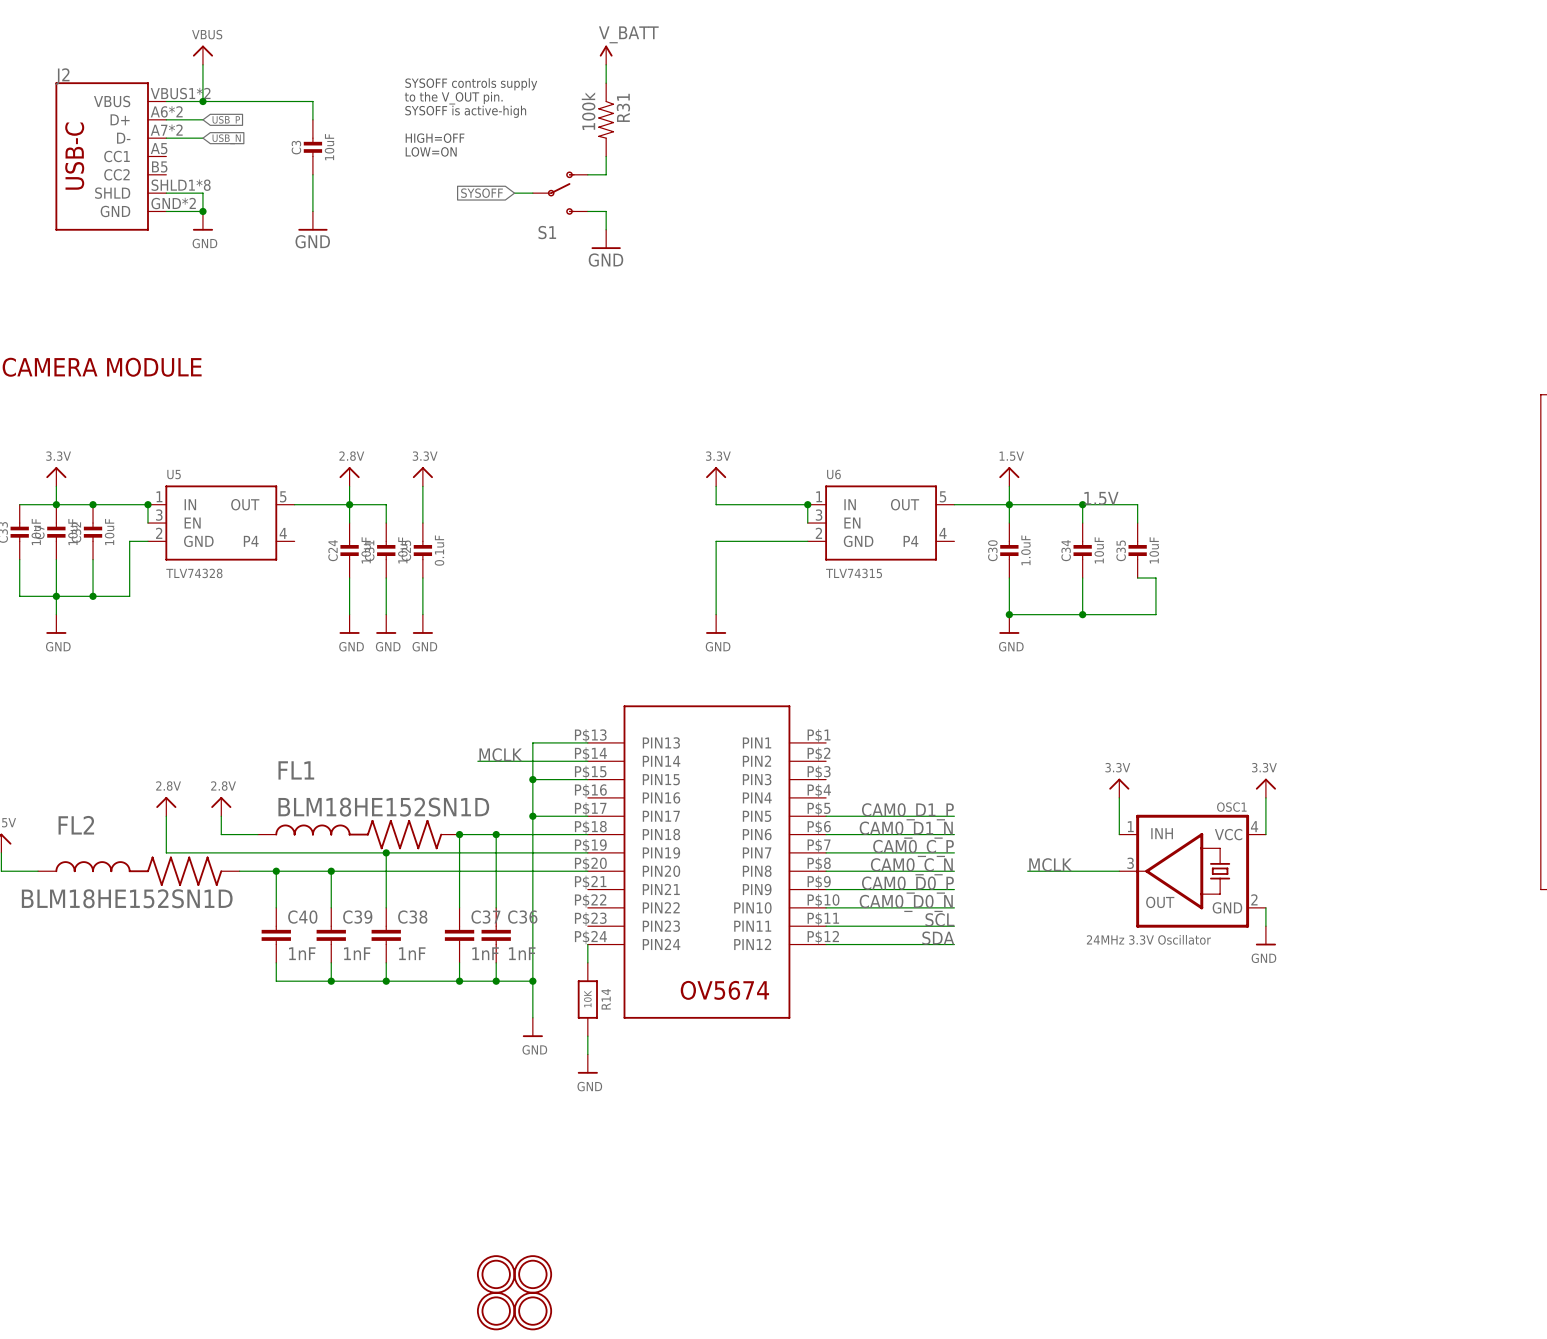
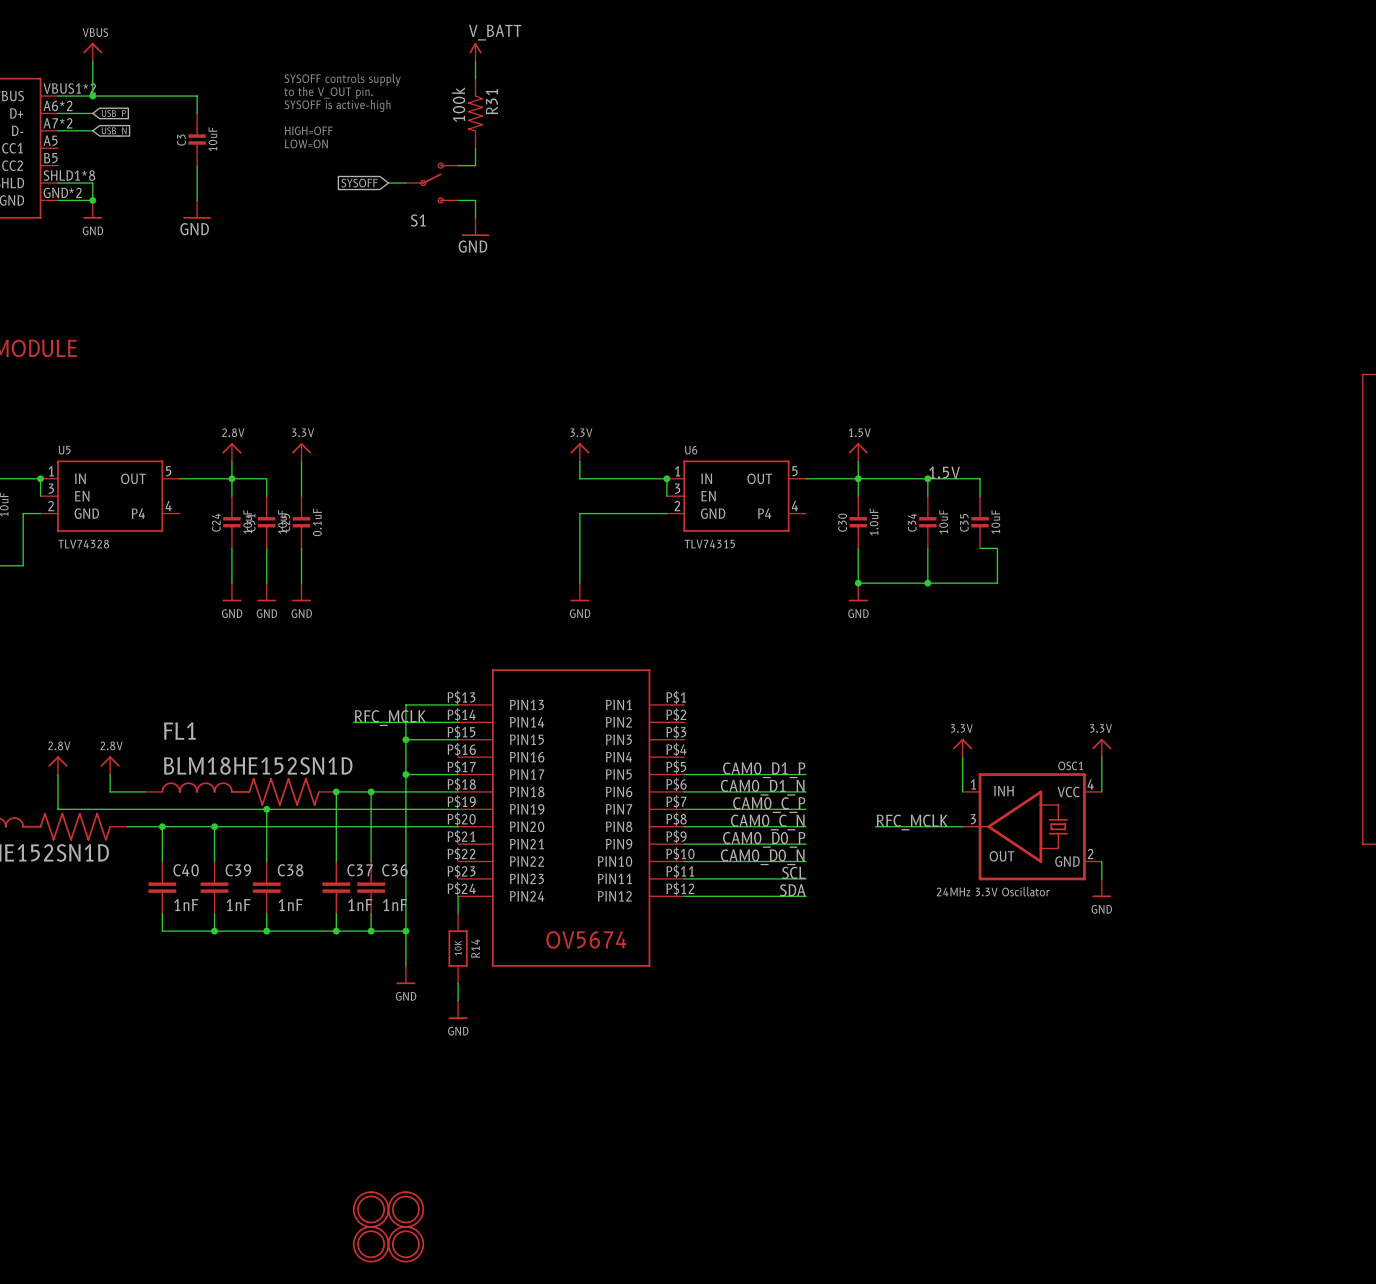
label: MCLK (500, 754) -> RFC_MCLK (390, 718)
label: MCLK (1050, 864) -> RFC_MCLK (912, 822)

